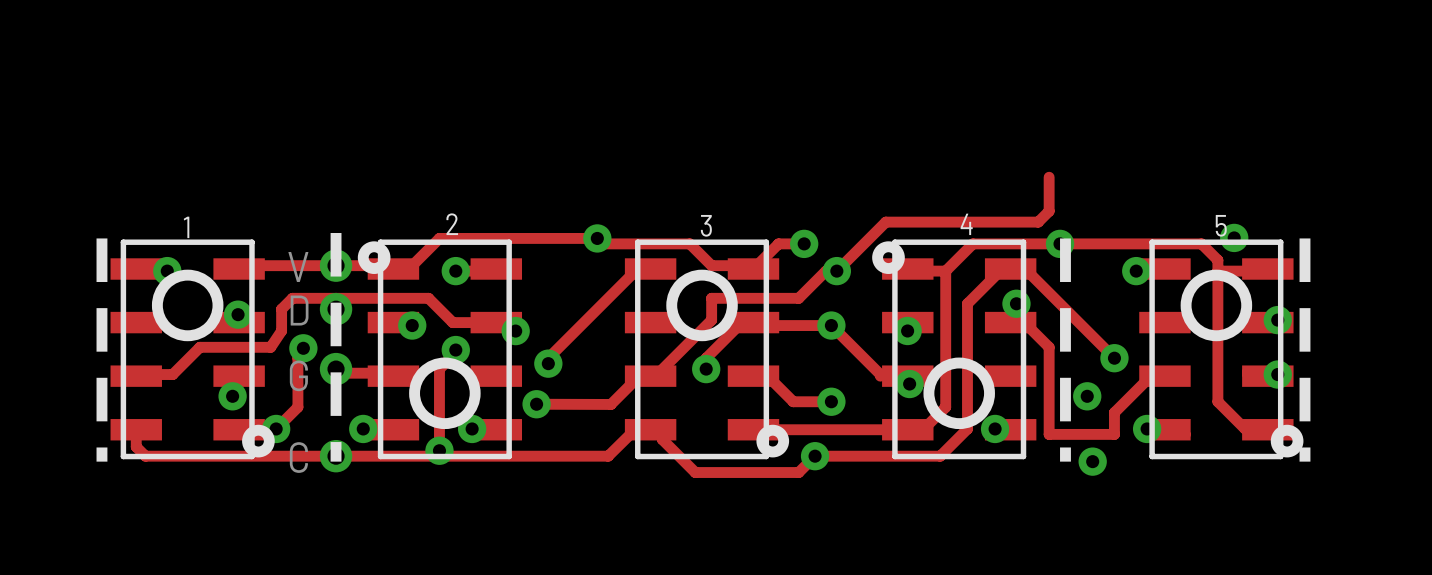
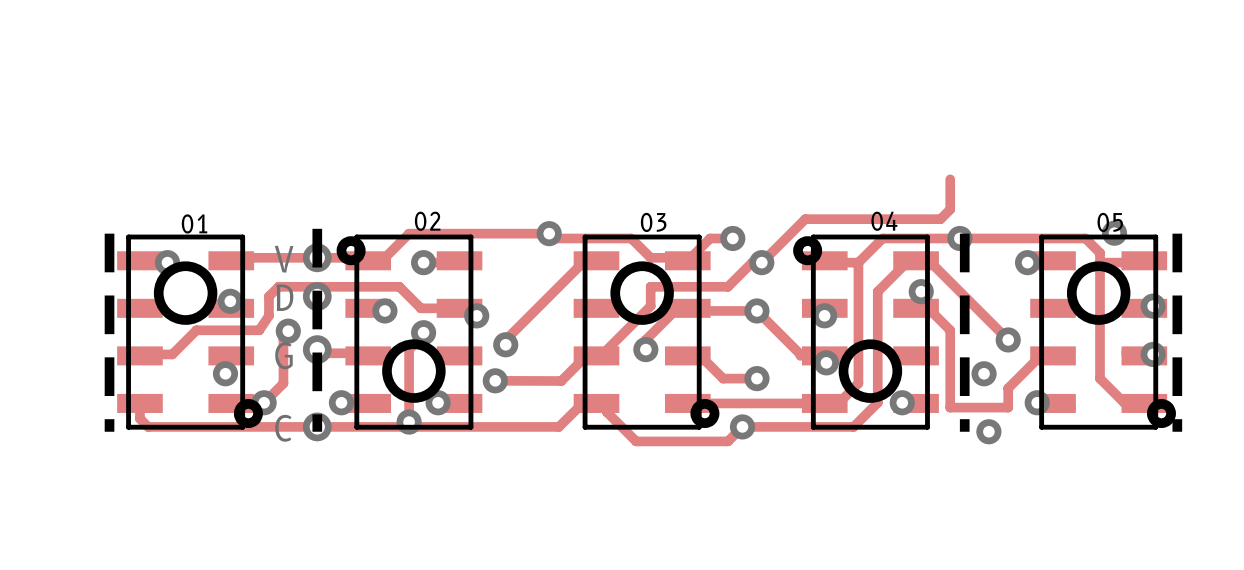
2 name: 2 (452, 224) -> 02 (427, 221)
4 name: 4 (966, 224) -> 04 (884, 221)
3 name: 3 (706, 225) -> 03 (653, 222)
5 name: 5 (1221, 225) -> 05 (1110, 222)
1 name: 1 (186, 227) -> 01 (194, 223)

